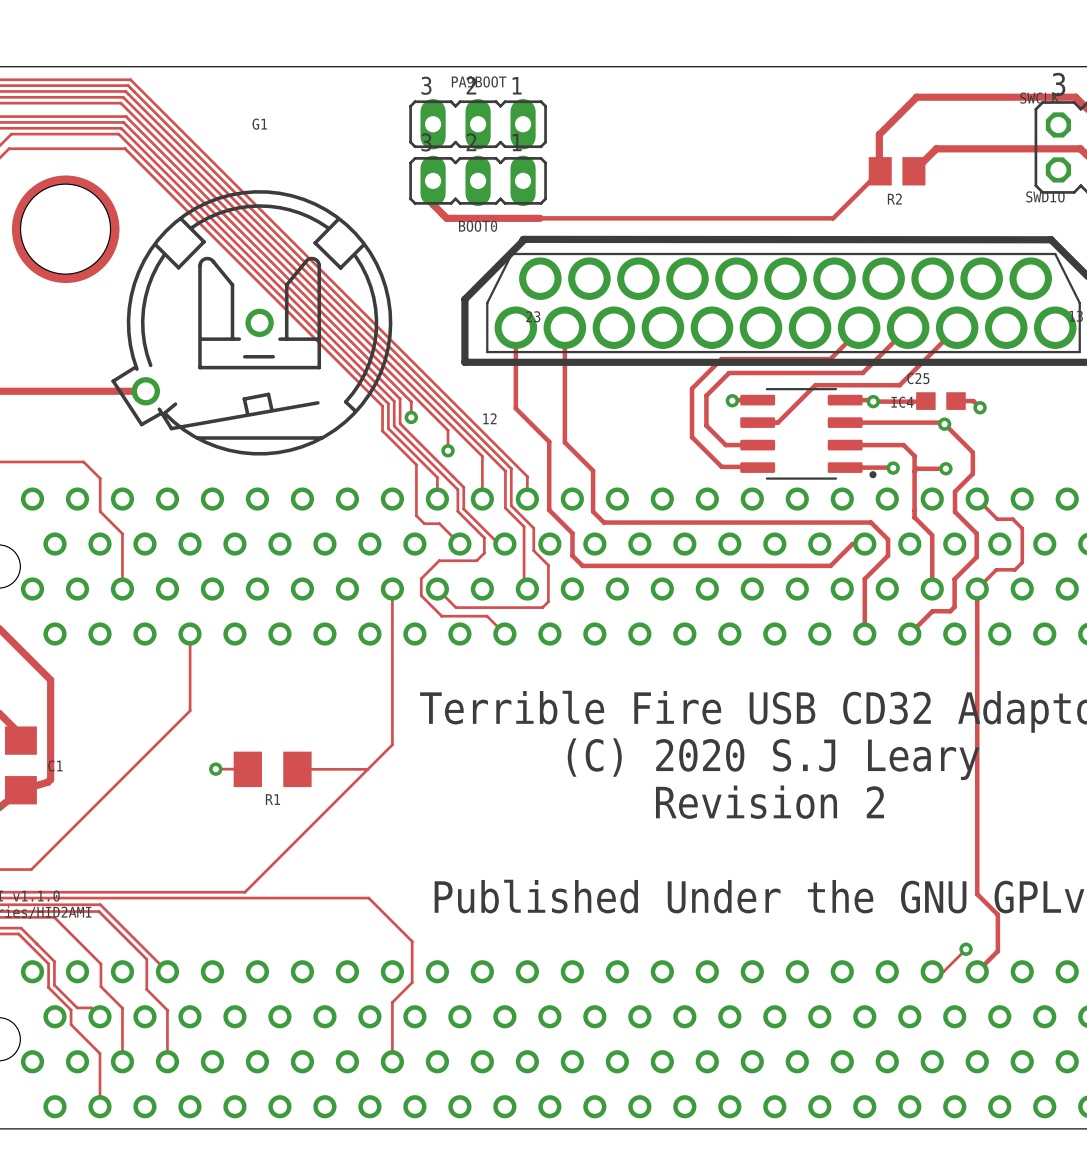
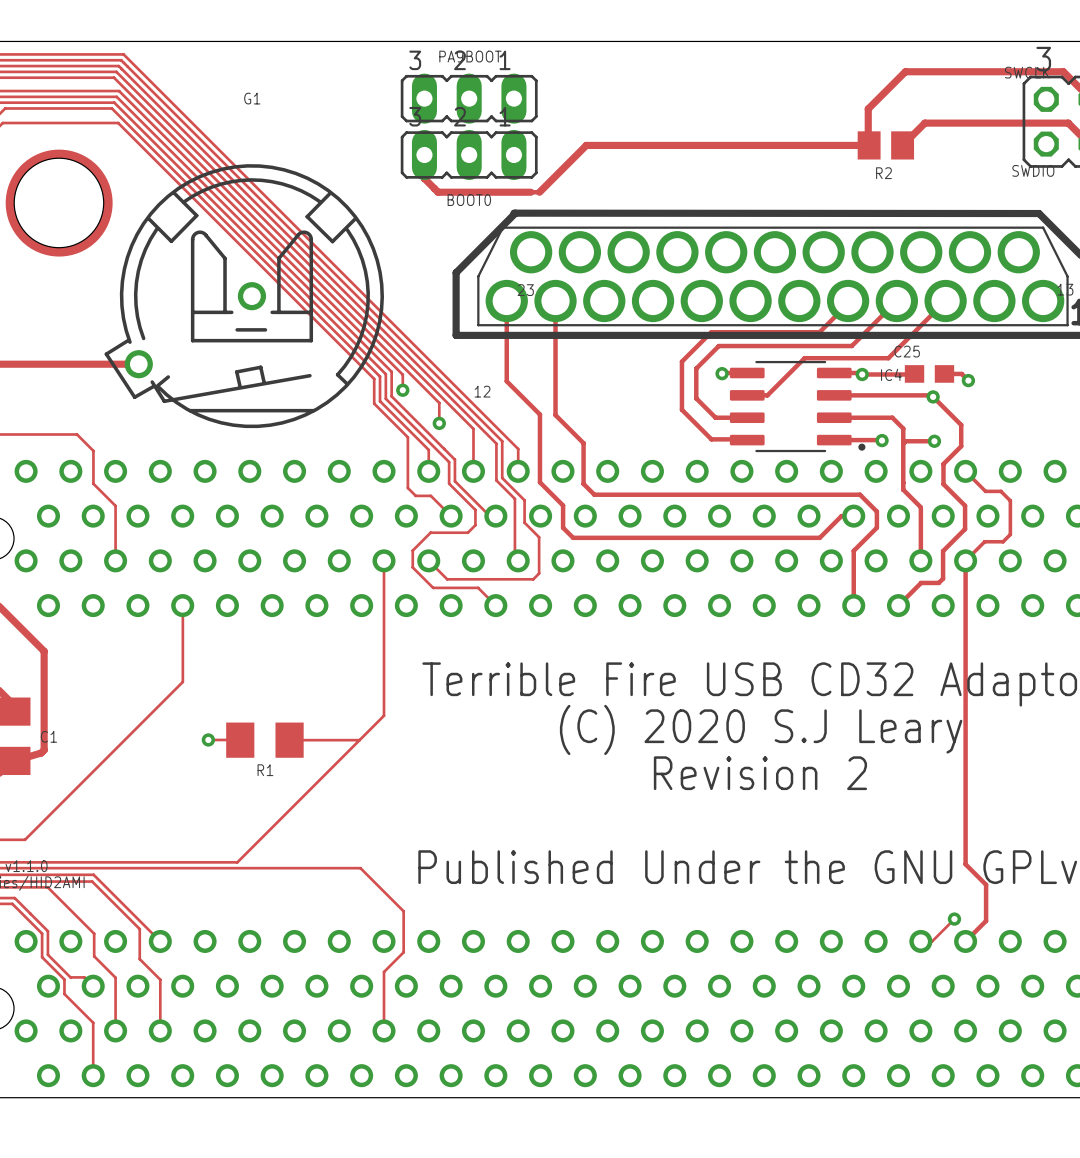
track: (879, 172) (833, 218) (548, 218) -> (869, 145) (586, 145) (539, 192)

